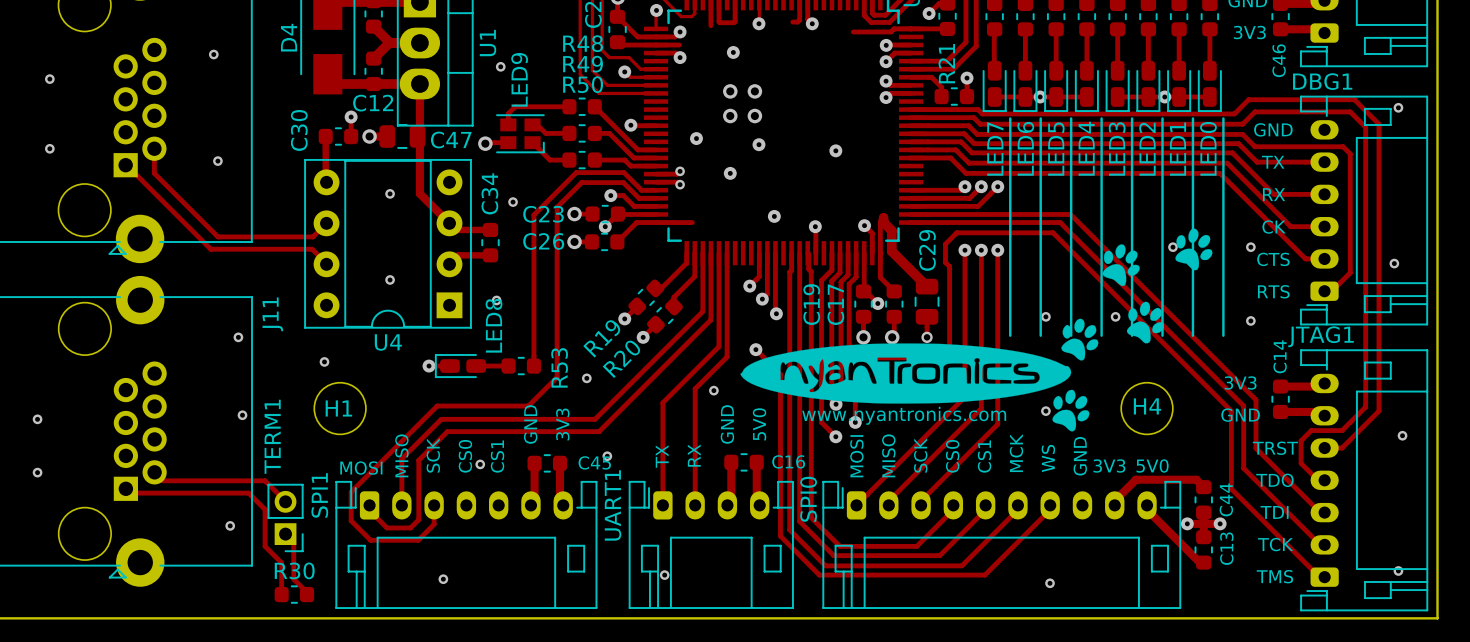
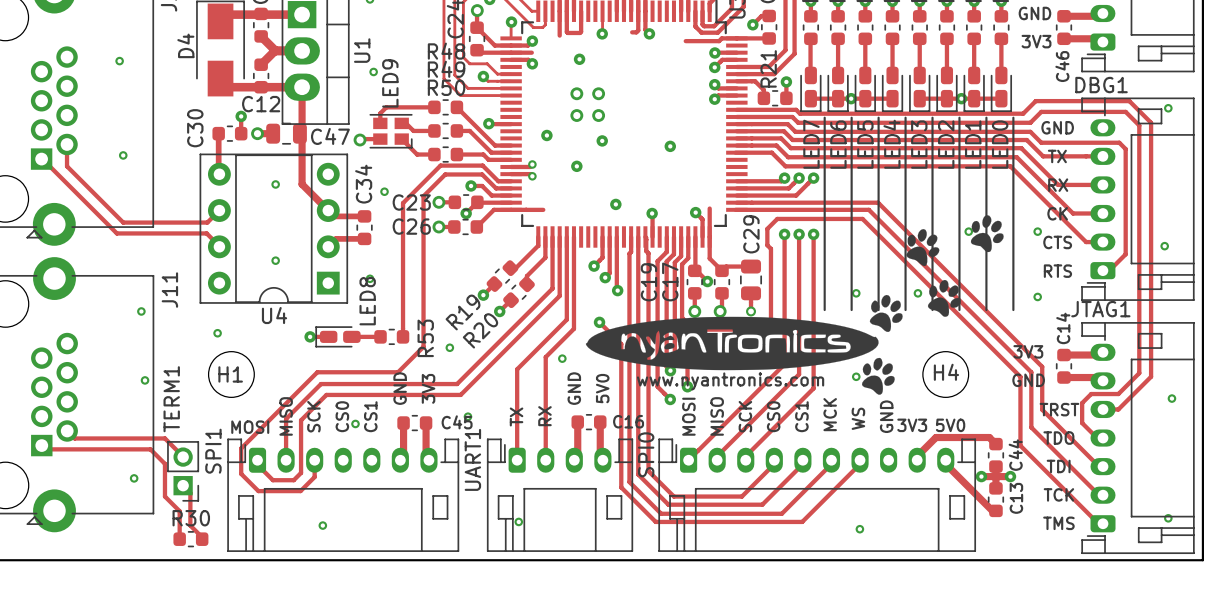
track: (883, 217) (883, 222) (891, 230) (891, 251) (927, 286) -> (721, 270) (726, 266) (751, 266)

